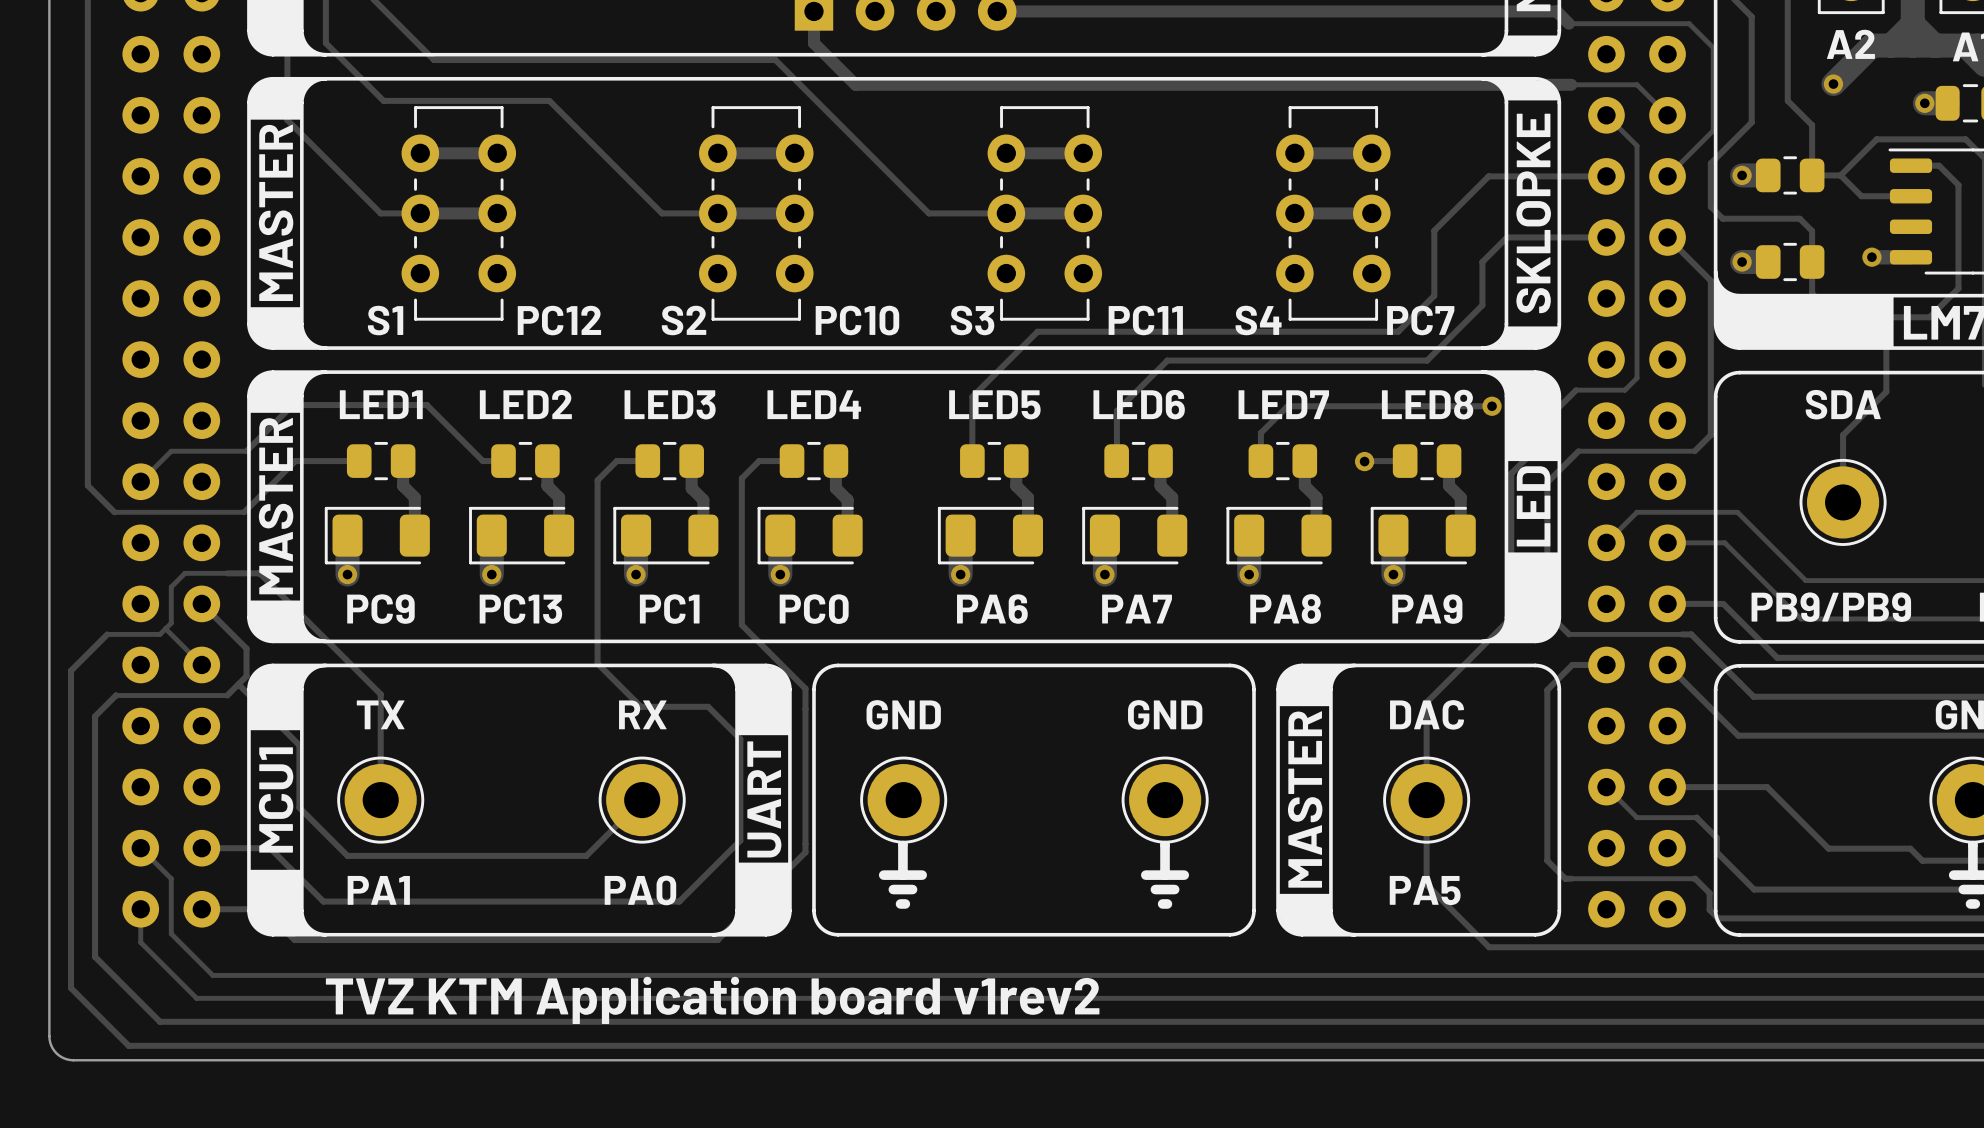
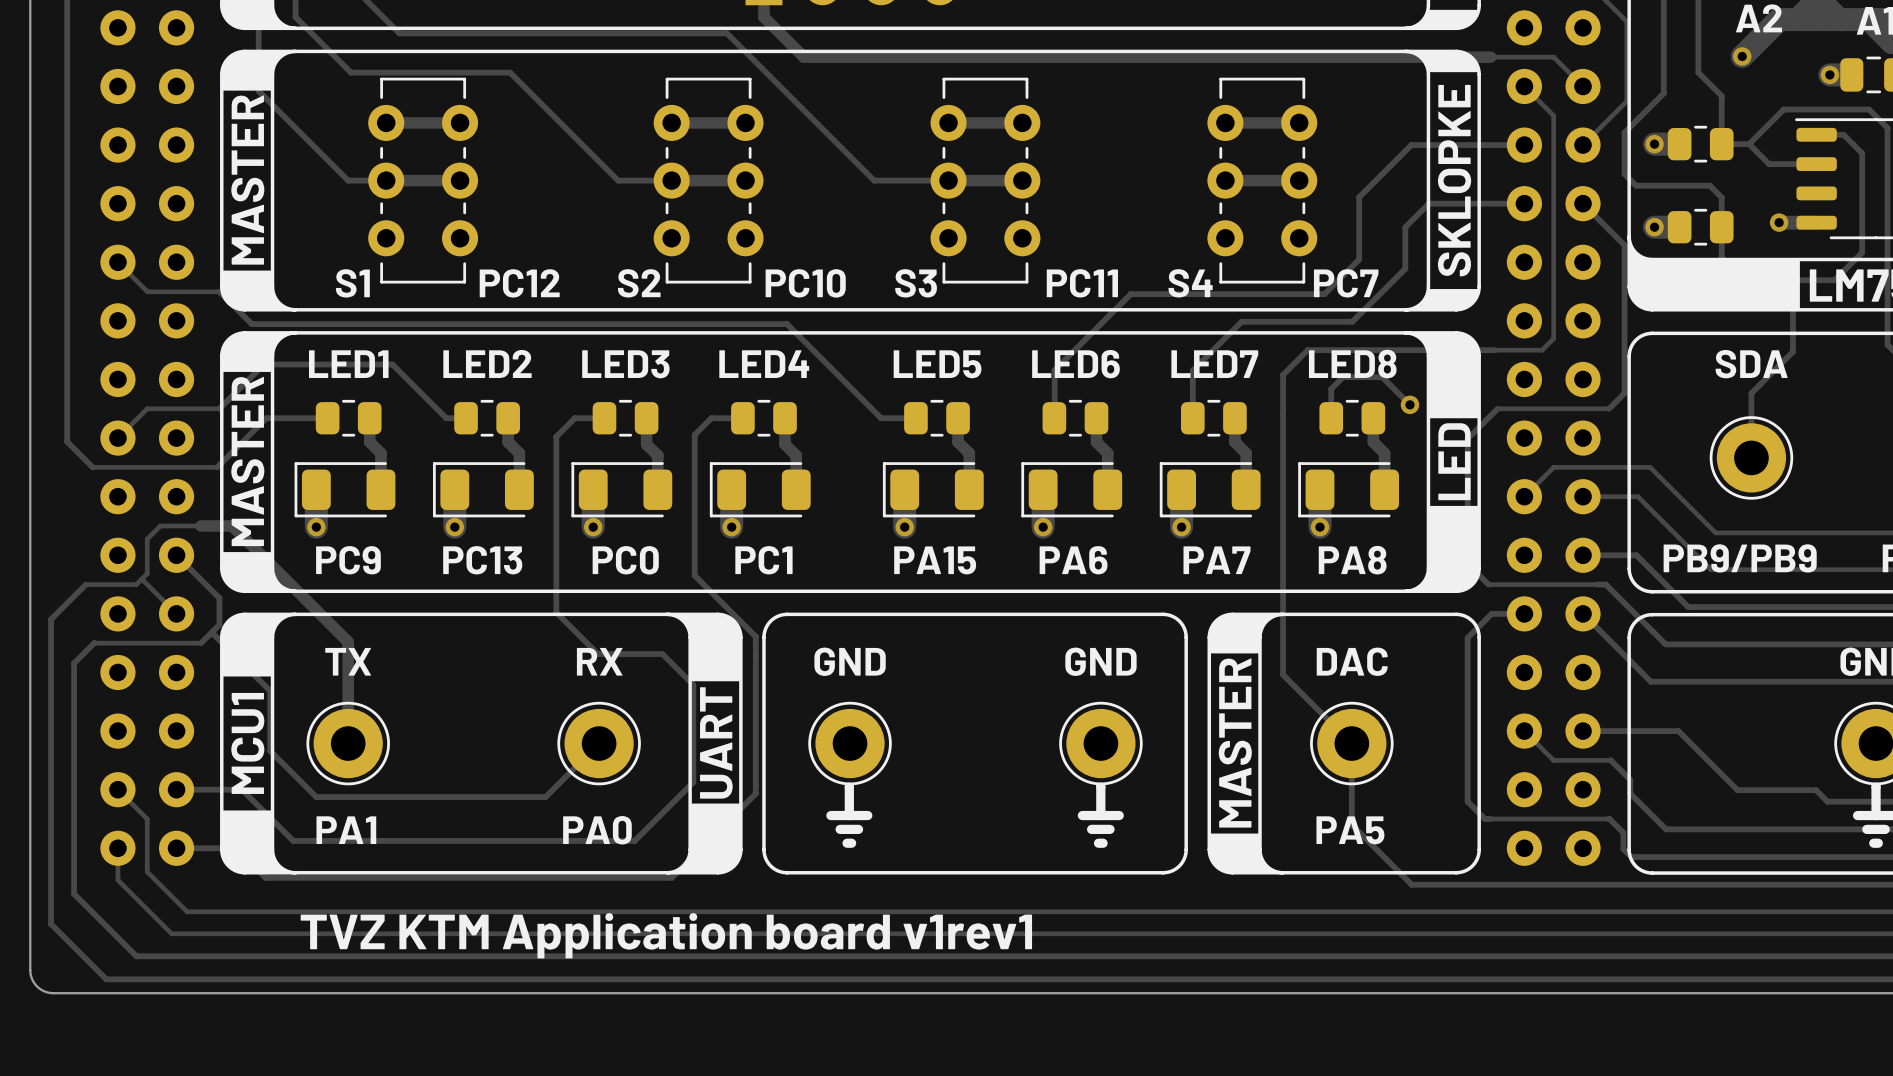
track: none -> (117, 262) (147, 291) (219, 291) (251, 324) (787, 324) (881, 418) (915, 418)
track: (1196, 331) (1037, 331) (972, 396) (972, 461) -> (1130, 294) (1103, 321)
track: (1167, 360) (1311, 360) -> (1192, 391) (1192, 370) (1241, 321)
track: (1576, 390) (1540, 426) (1540, 444) (1511, 473) (1511, 617) (1426, 702) (1426, 800) -> (1495, 350) (1307, 350) (1283, 374) (1283, 674) (1351, 743)
track: (1492, 406) (1287, 406) (1260, 433) -> none
via position: (1492, 406) -> (1409, 404)
via: (1364, 461) -> none
track: (1405, 461) (1364, 461) -> (1331, 418) (1331, 389) (1343, 377) (1382, 377) (1409, 404)
track width: thin (227, 573) (258, 573) -> thick (201, 525) (231, 525)
track width: thin (259, 573) (380, 694) (380, 800) -> thick (232, 525) (348, 642) (348, 743)
text: PA8 (1285, 608) -> PA7 (1217, 560)
text: PC1 (669, 609) -> PC0 (625, 560)
text: PC0 (814, 609) -> PC1 (763, 560)
text: PA6 (992, 609) -> PA15 (935, 560)
text: PA7 (1137, 609) -> PA6 (1073, 560)
text: PA9 (1427, 609) -> PA8 (1352, 560)
text: TVZ KTM Application board v1rev2 (712, 1000) -> TVZ KTM Application board v1rev1 (666, 935)

